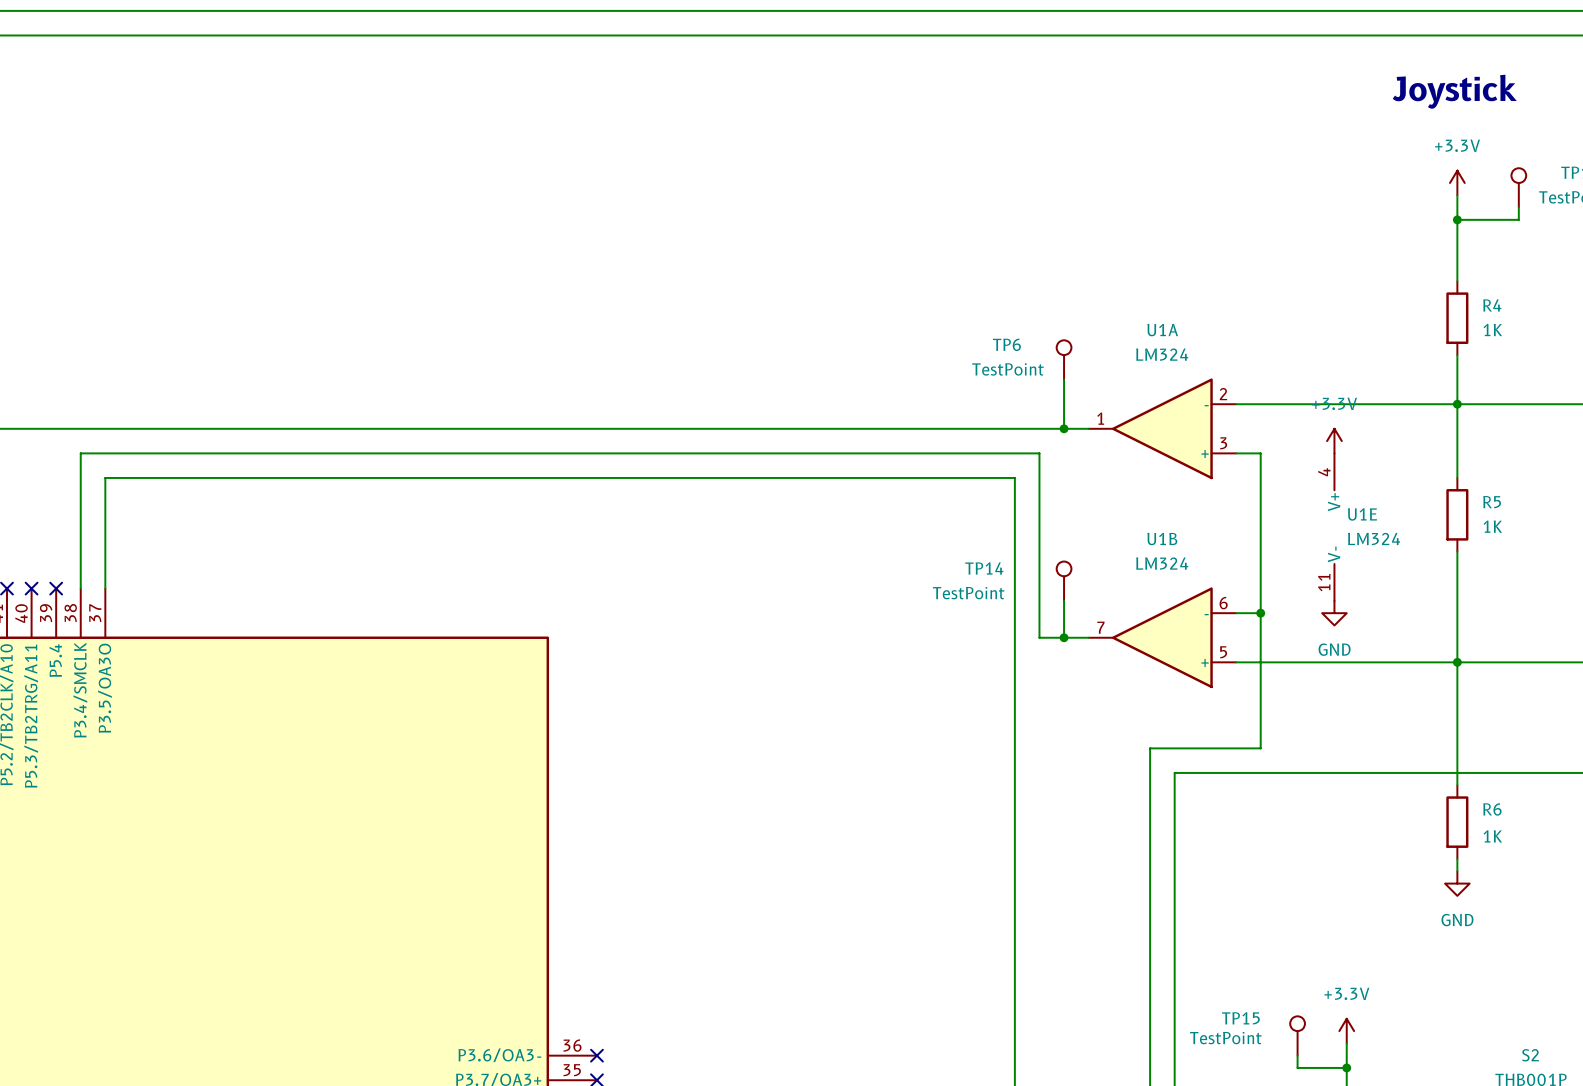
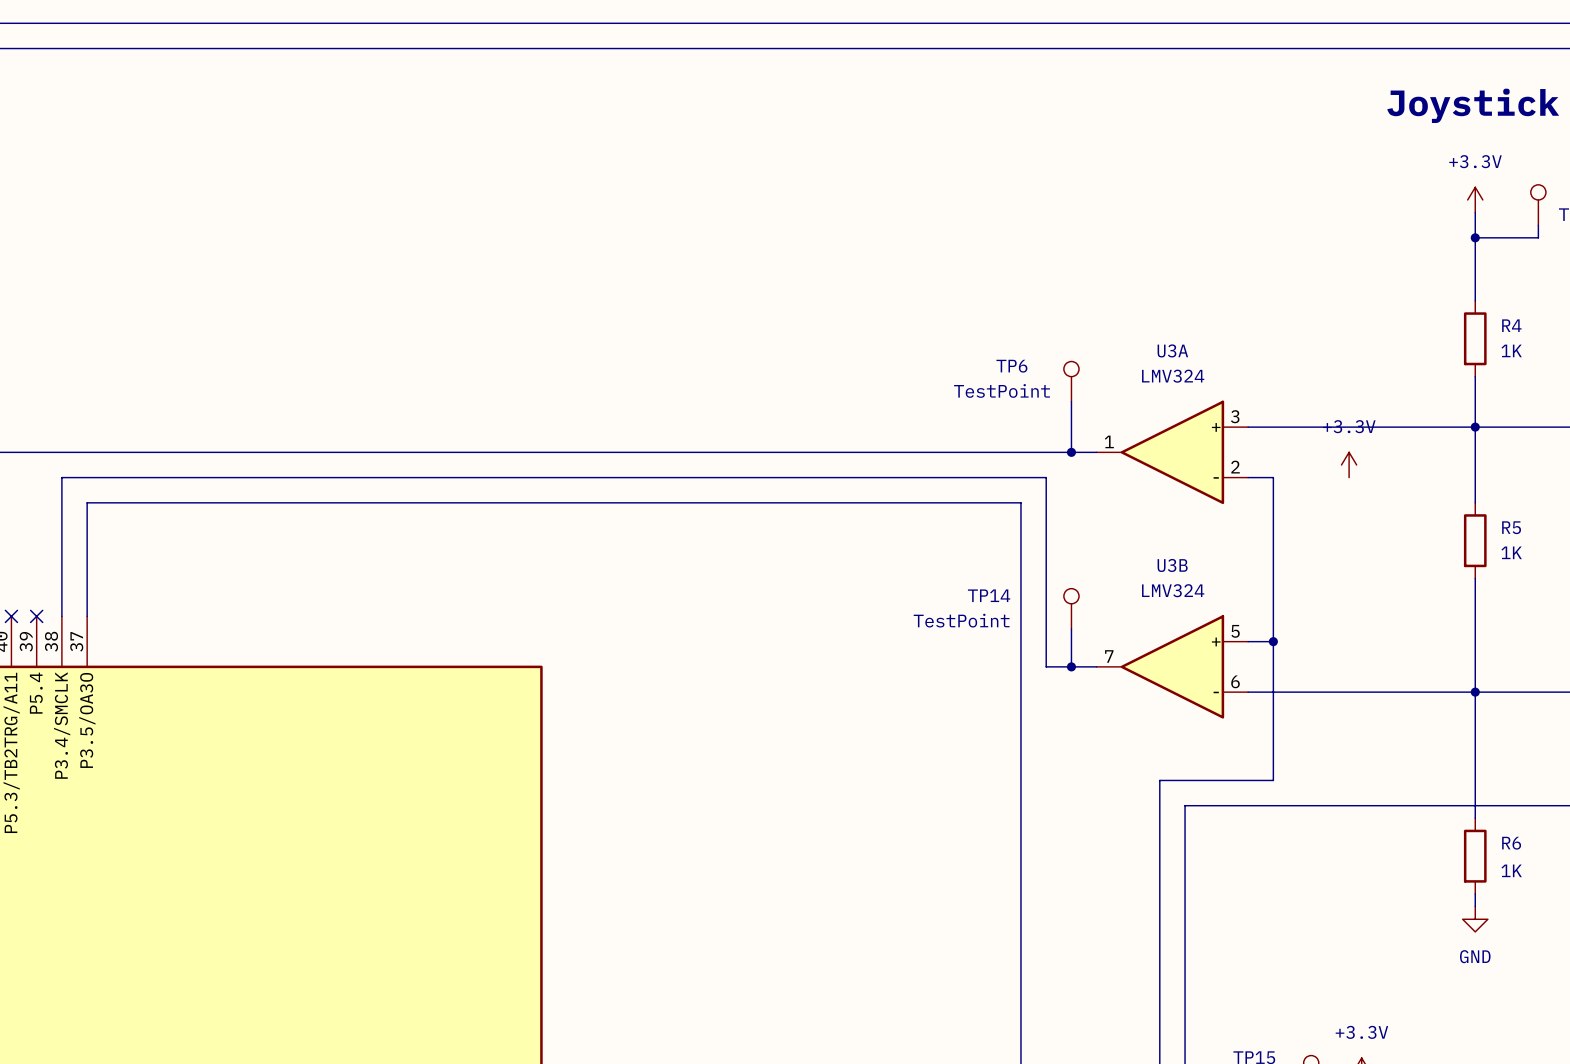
U1A name: U1A (1162, 330) -> U3A (1172, 350)
U1A value: LM324 (1162, 354) -> LMV324 (1173, 376)
U1A flip: as is (1162, 428) -> up-down (1172, 452)
U1E: LM324 (1334, 527) -> none
U1B name: U1B (1162, 539) -> U3B (1172, 565)
U1B value: LM324 (1162, 563) -> LMV324 (1173, 590)
power symbol: GND (1334, 613) -> none
U1B flip: as is (1162, 637) -> up-down (1172, 666)

